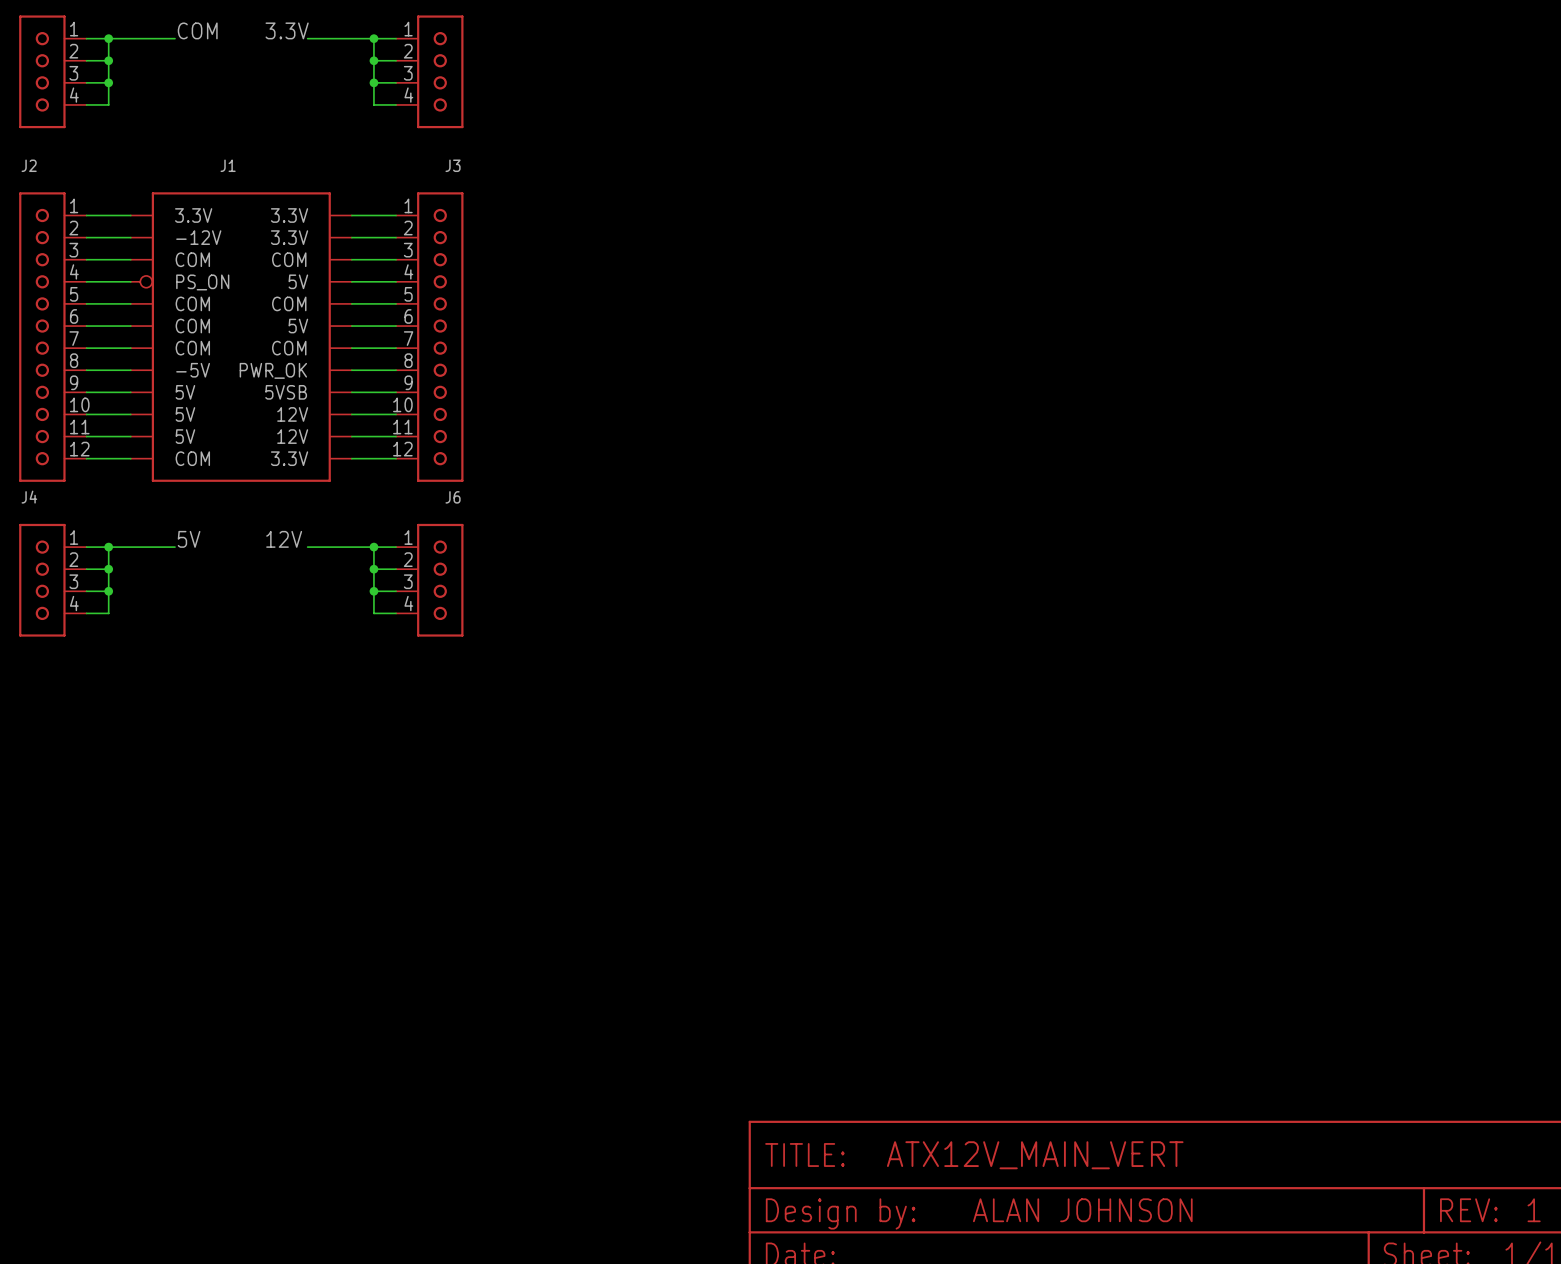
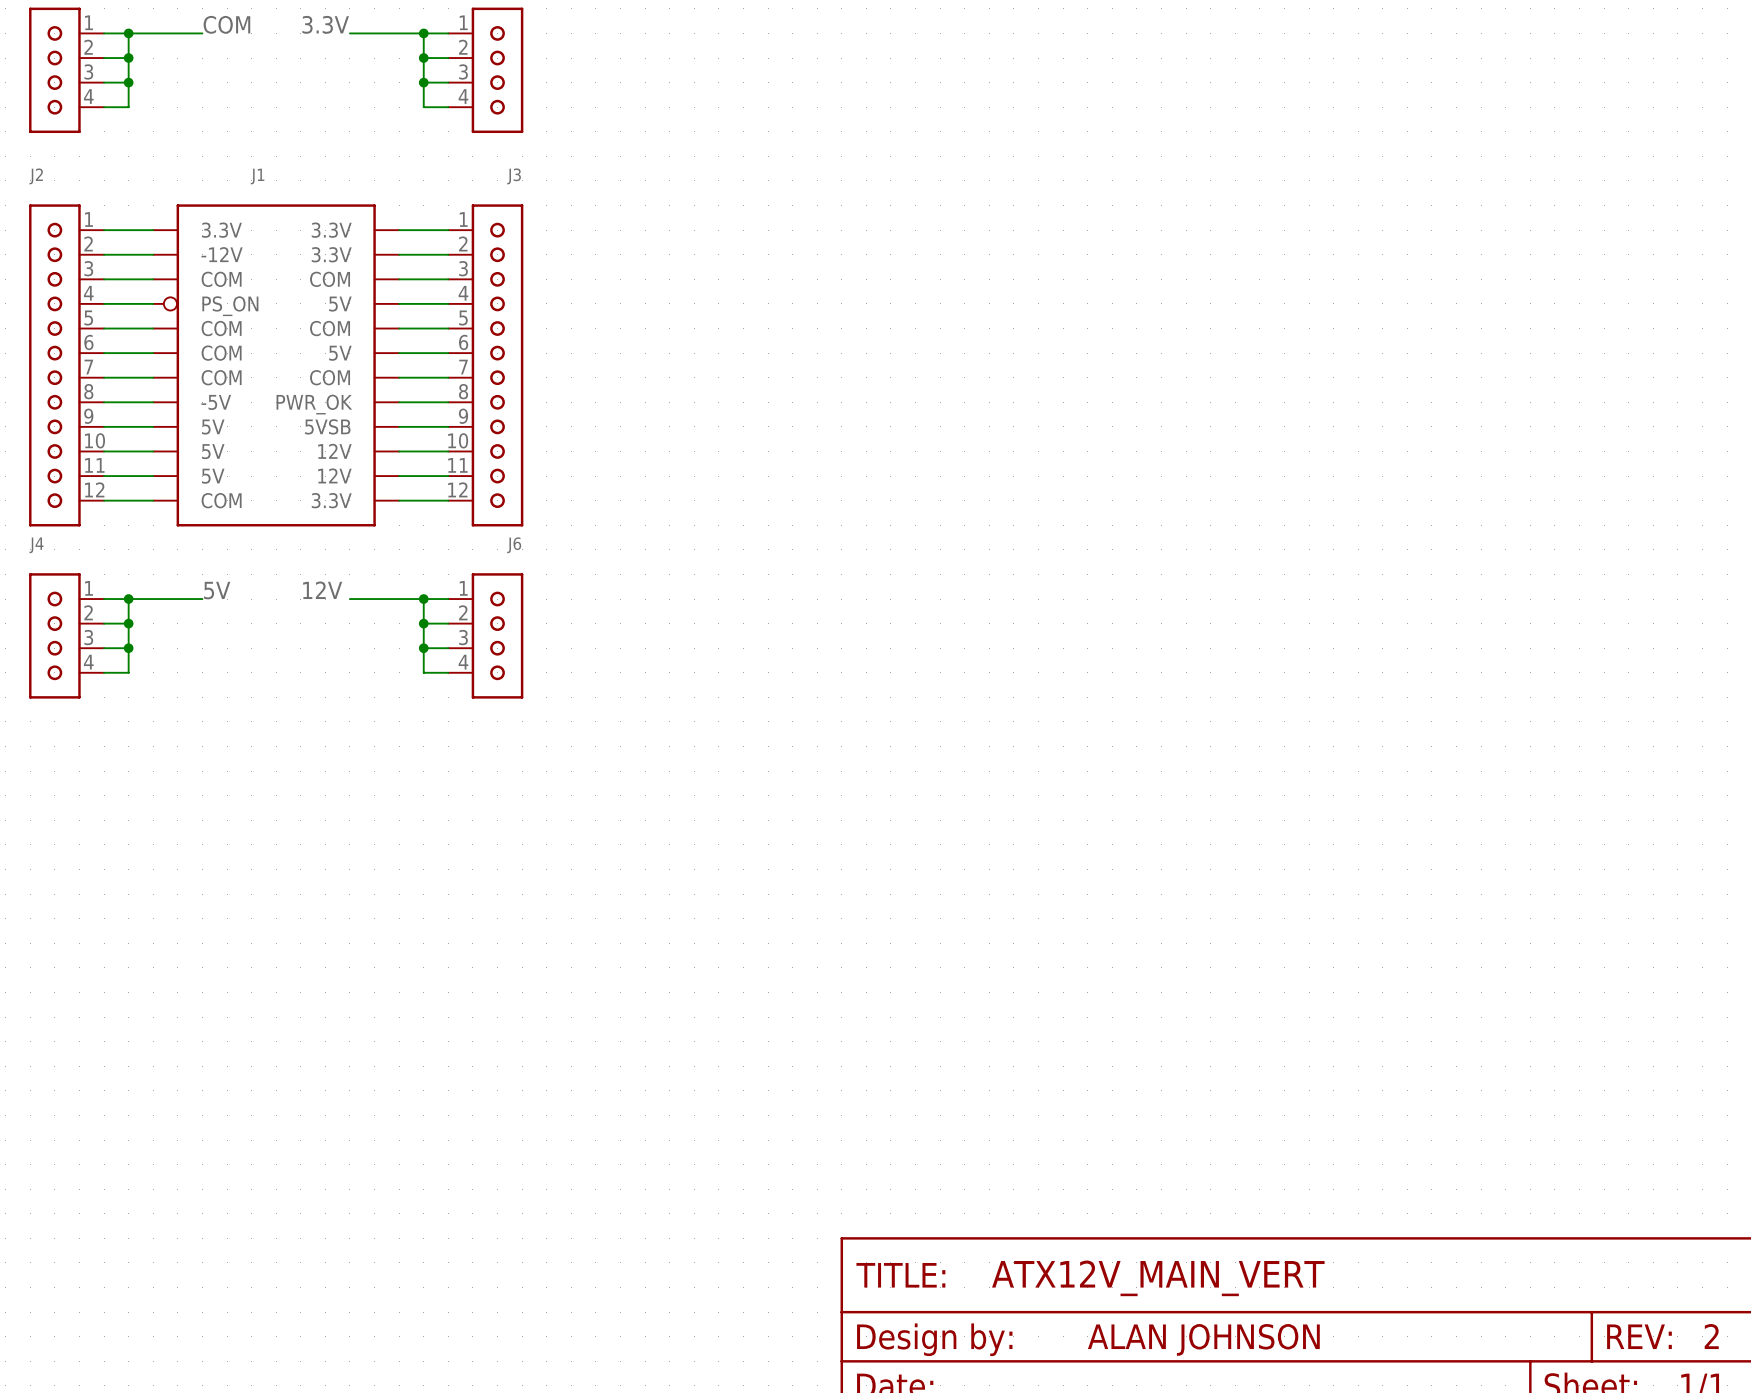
text: 1 (1534, 1210) -> 2 (1711, 1336)

